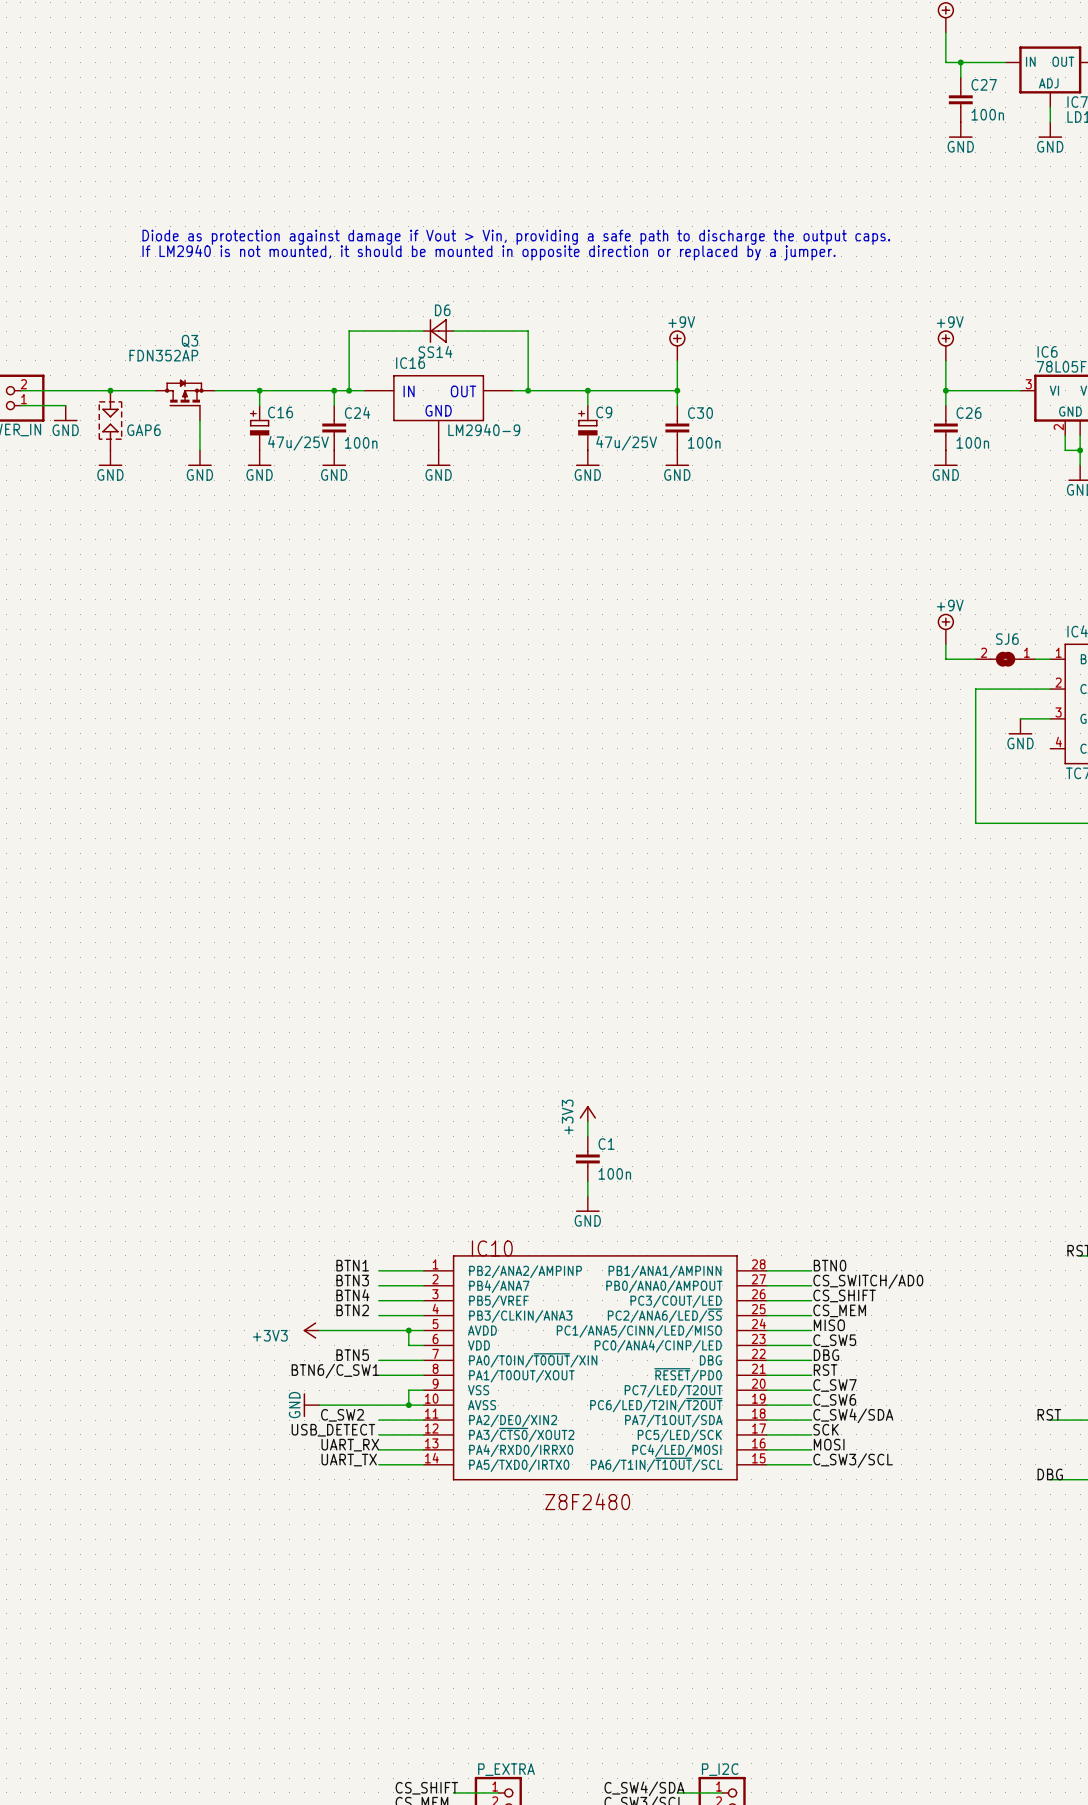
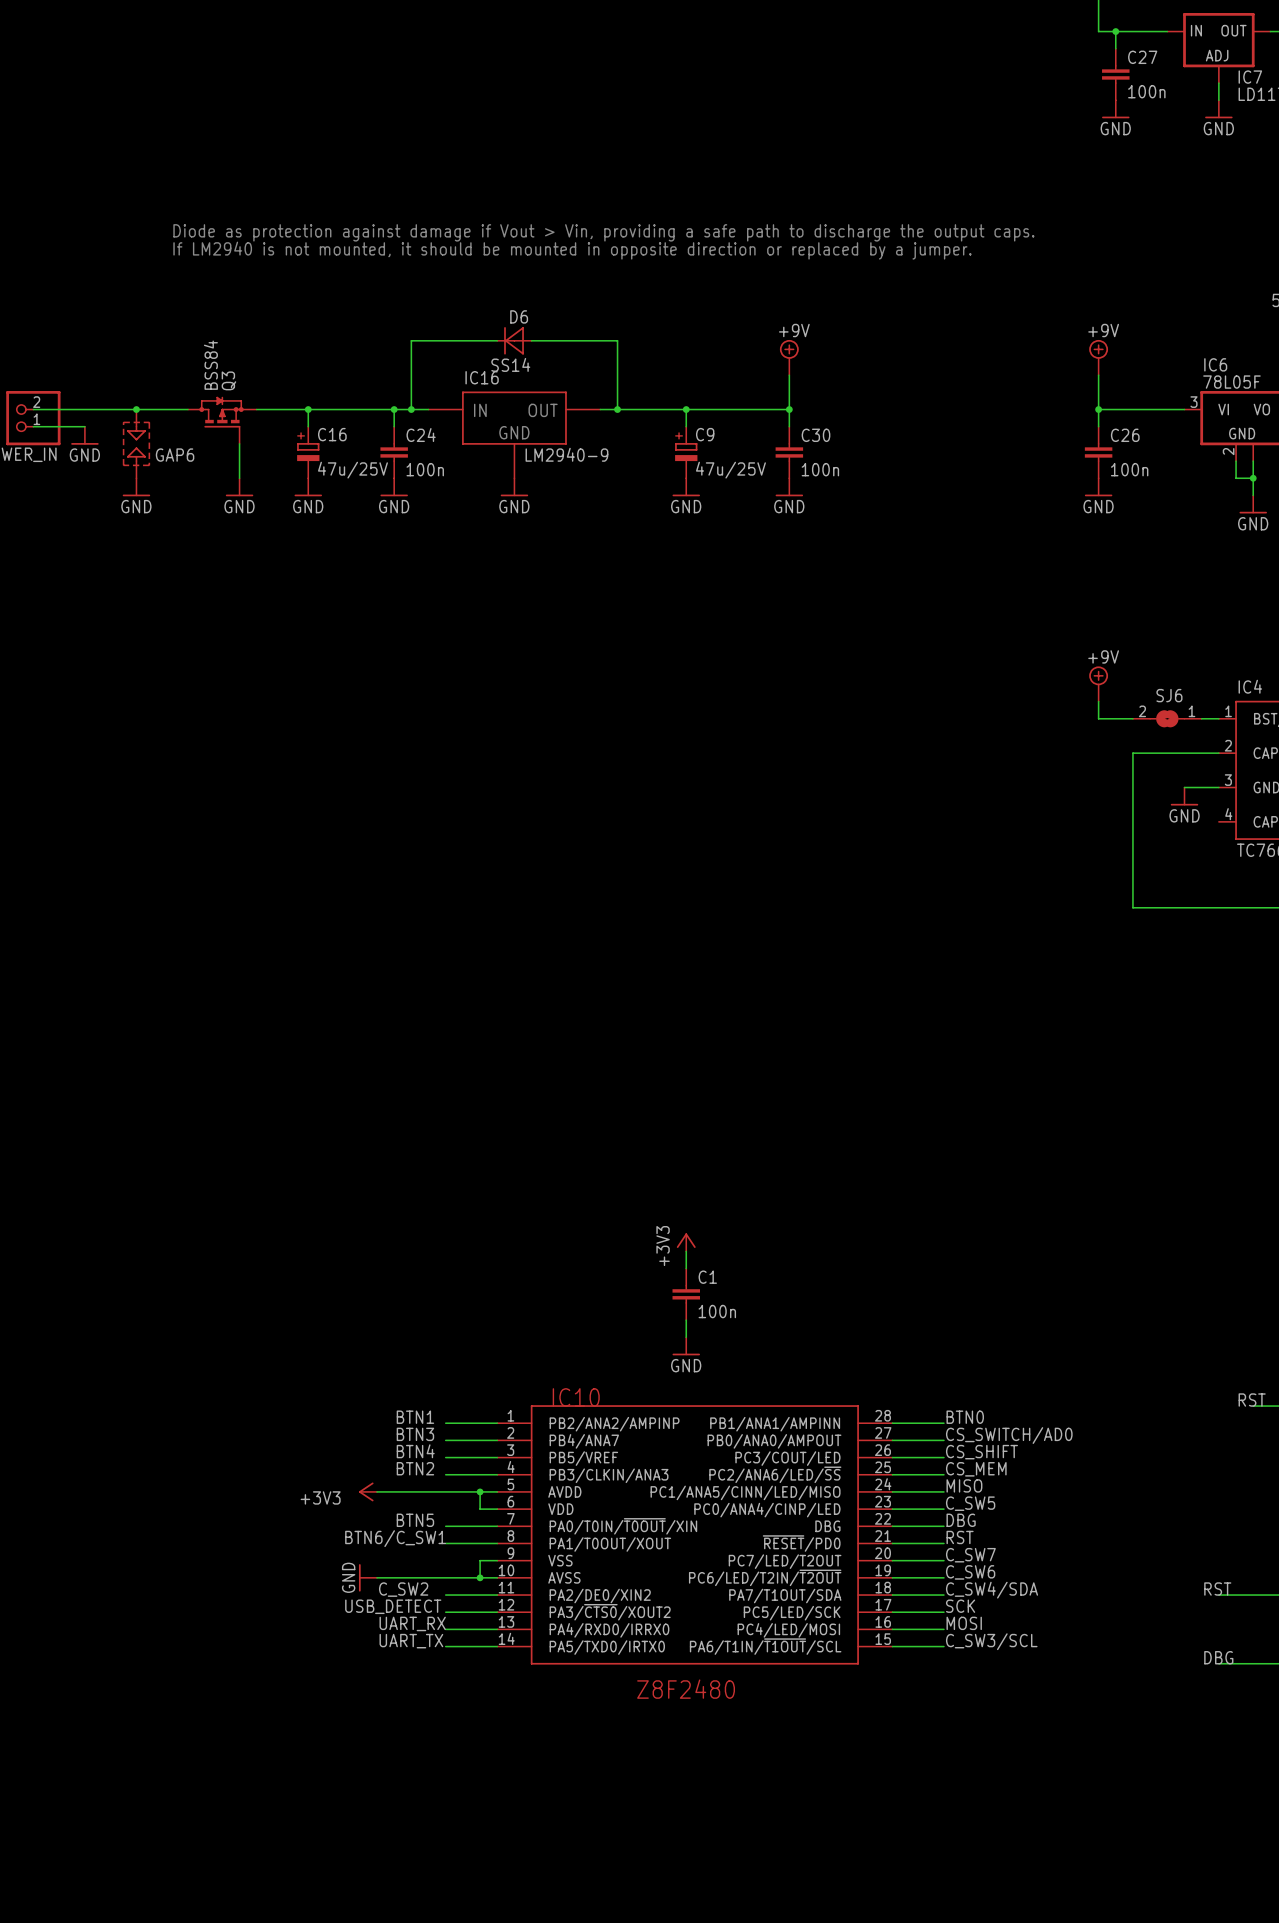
Q3 name rotation: 0° (190, 341) -> 90° counterclockwise (228, 380)
Q3 value: FDN352AP (163, 355) -> BSS84 (210, 365)

